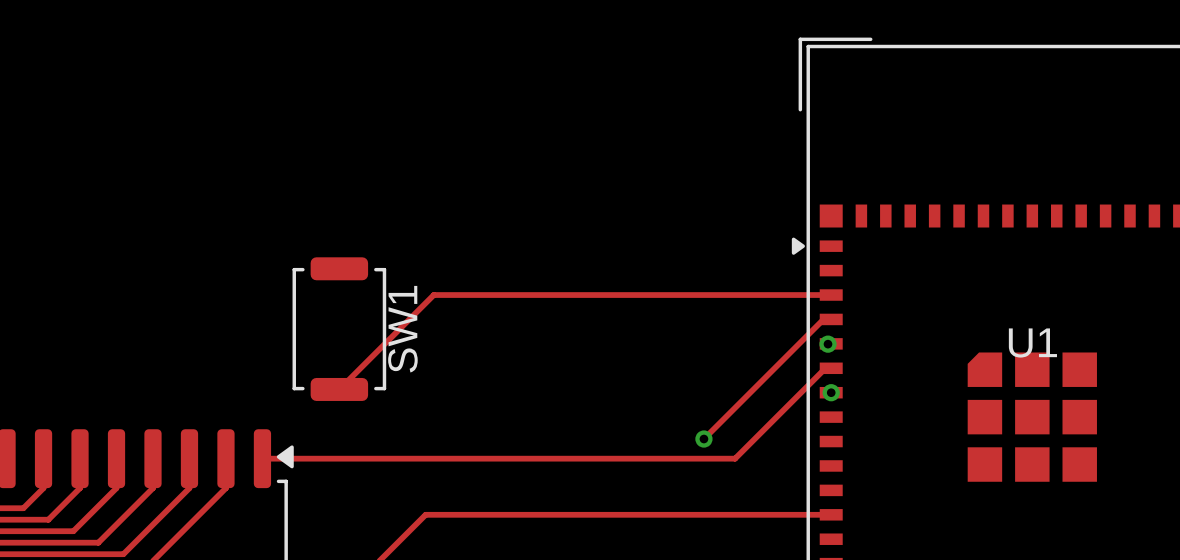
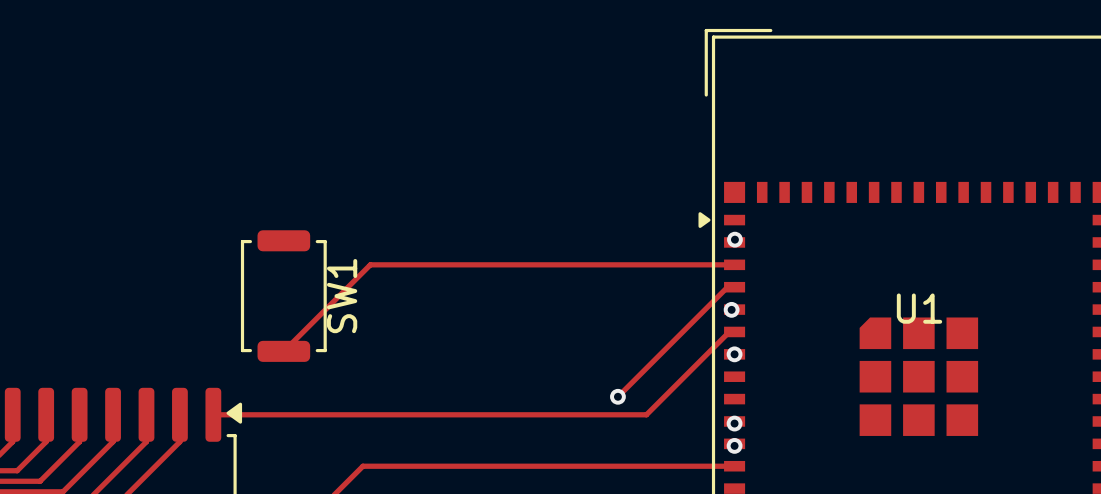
via: none -> (734, 239)
via: none -> (734, 423)
via: none -> (734, 445)

